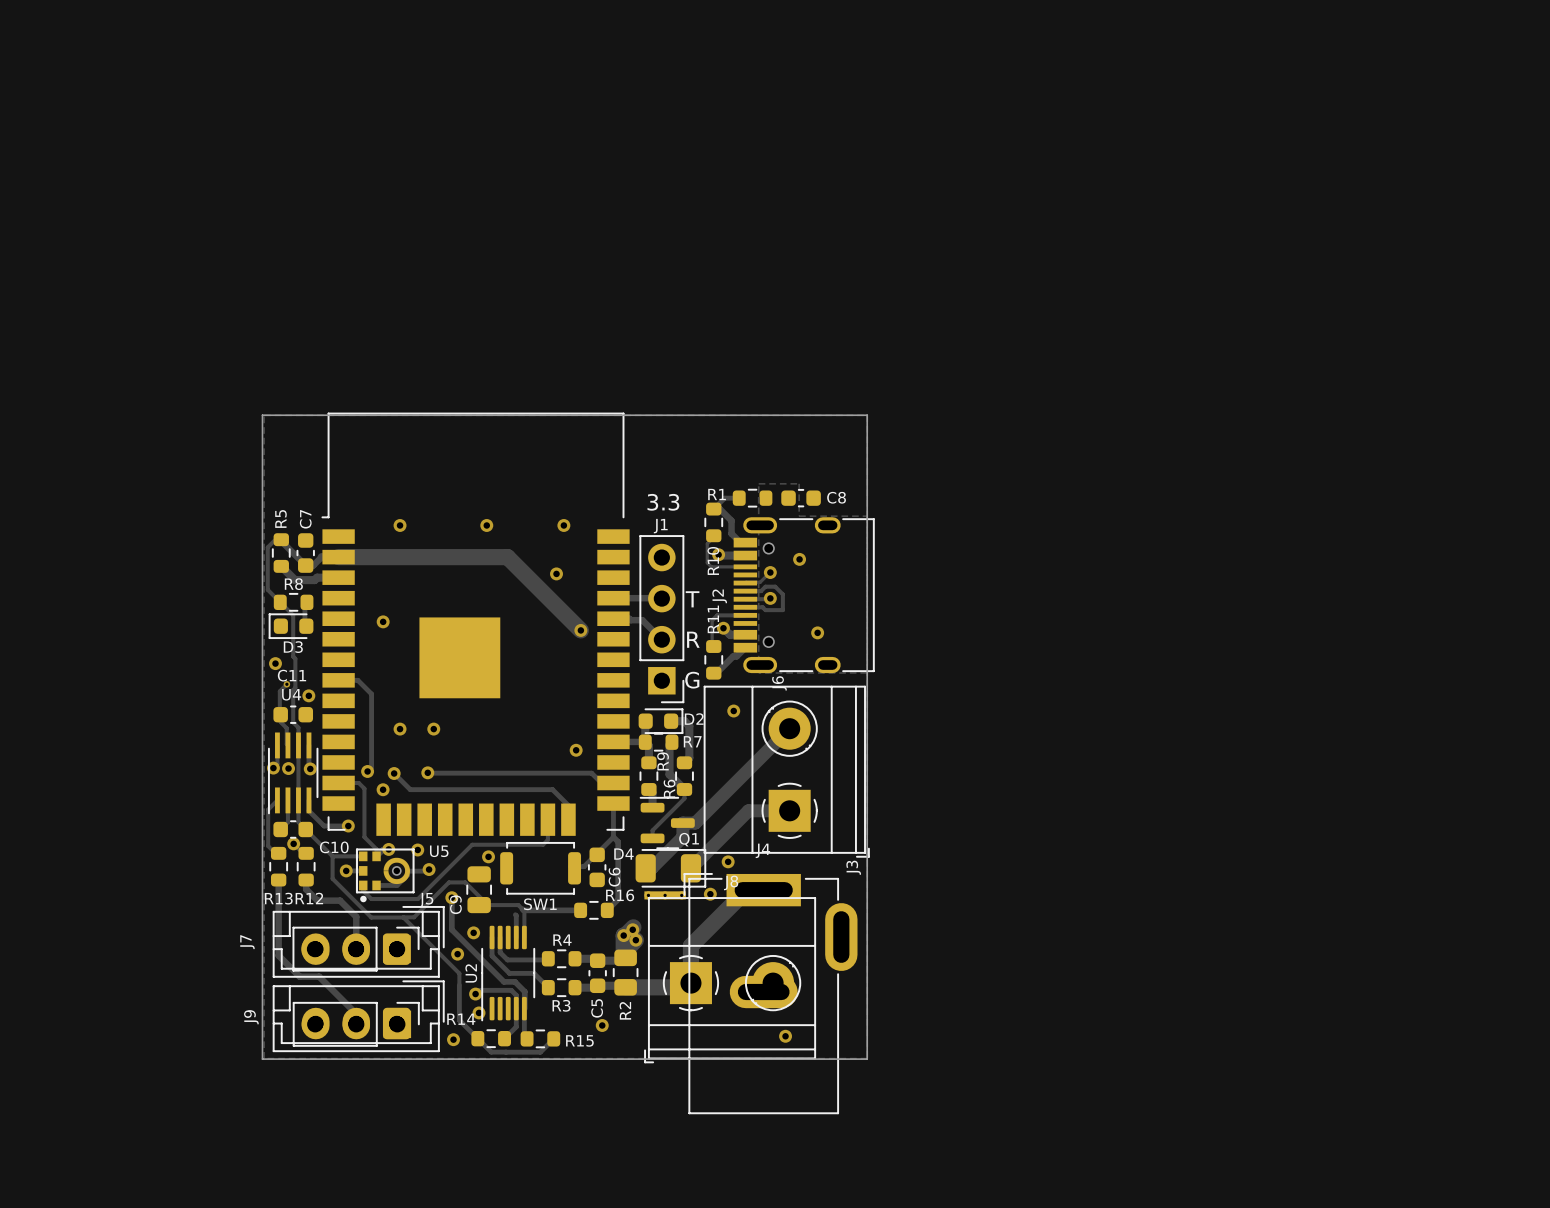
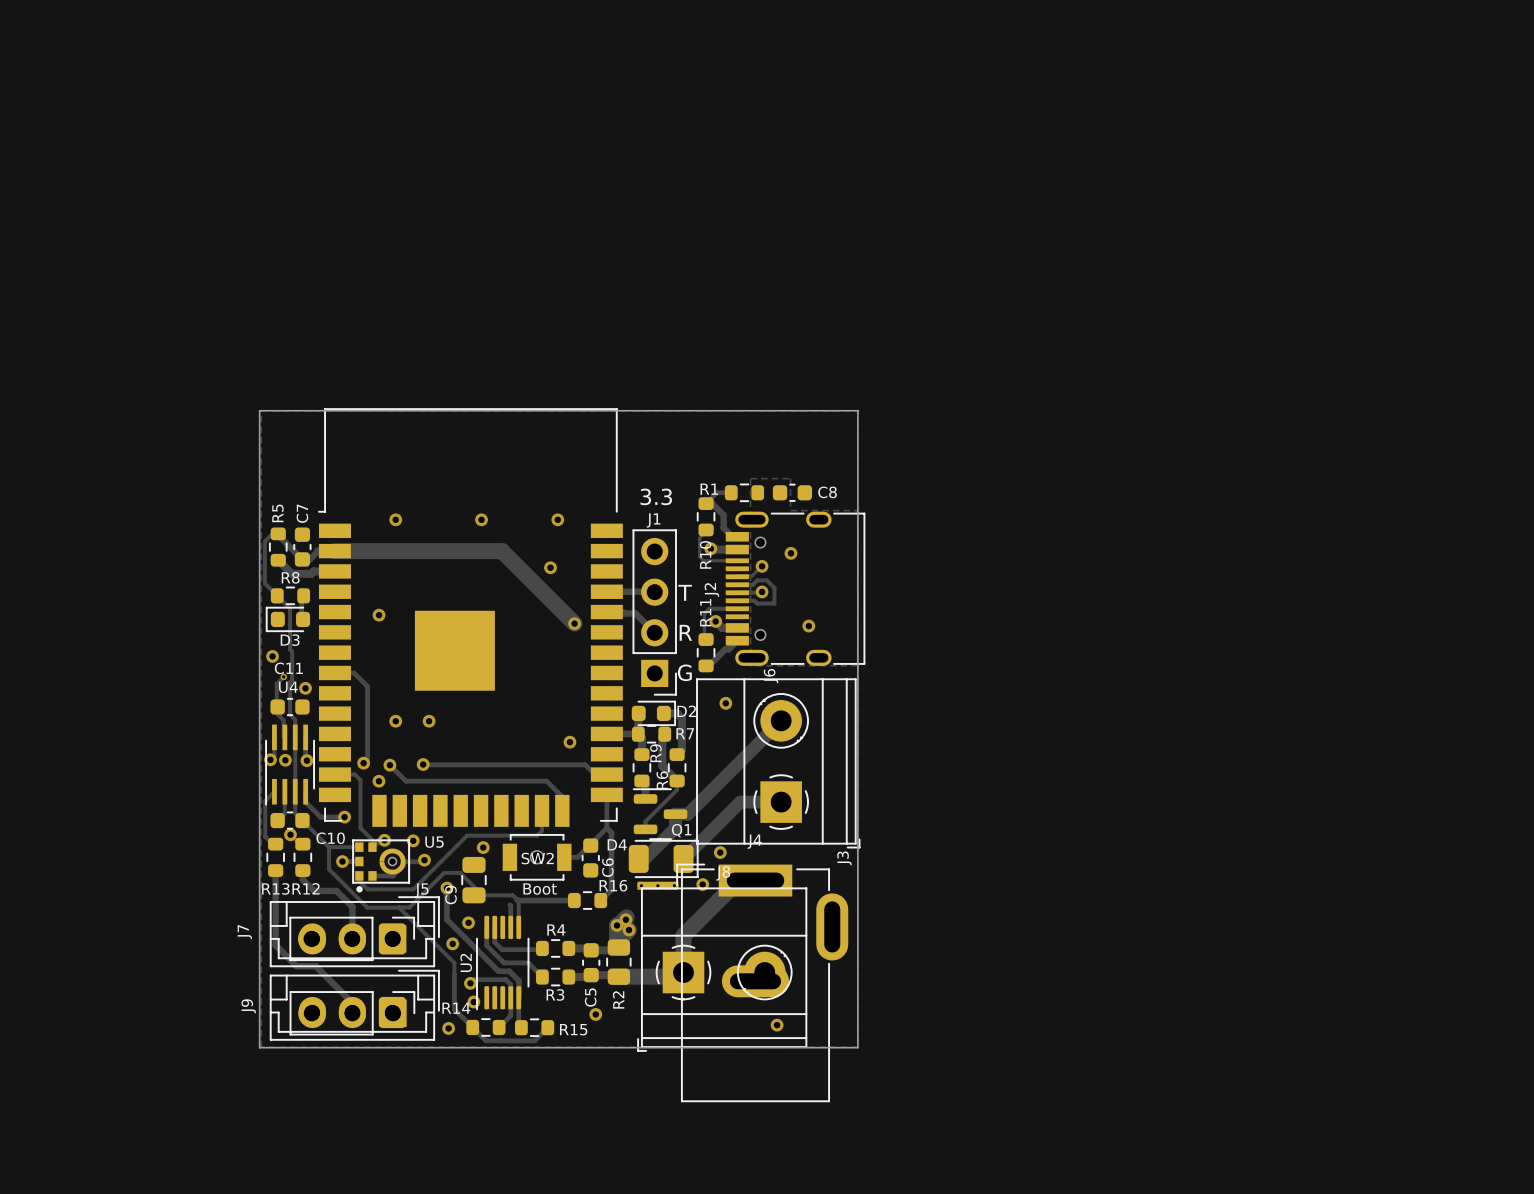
SW2: none -> Boot (537, 857)
SW1: (540, 868) -> none

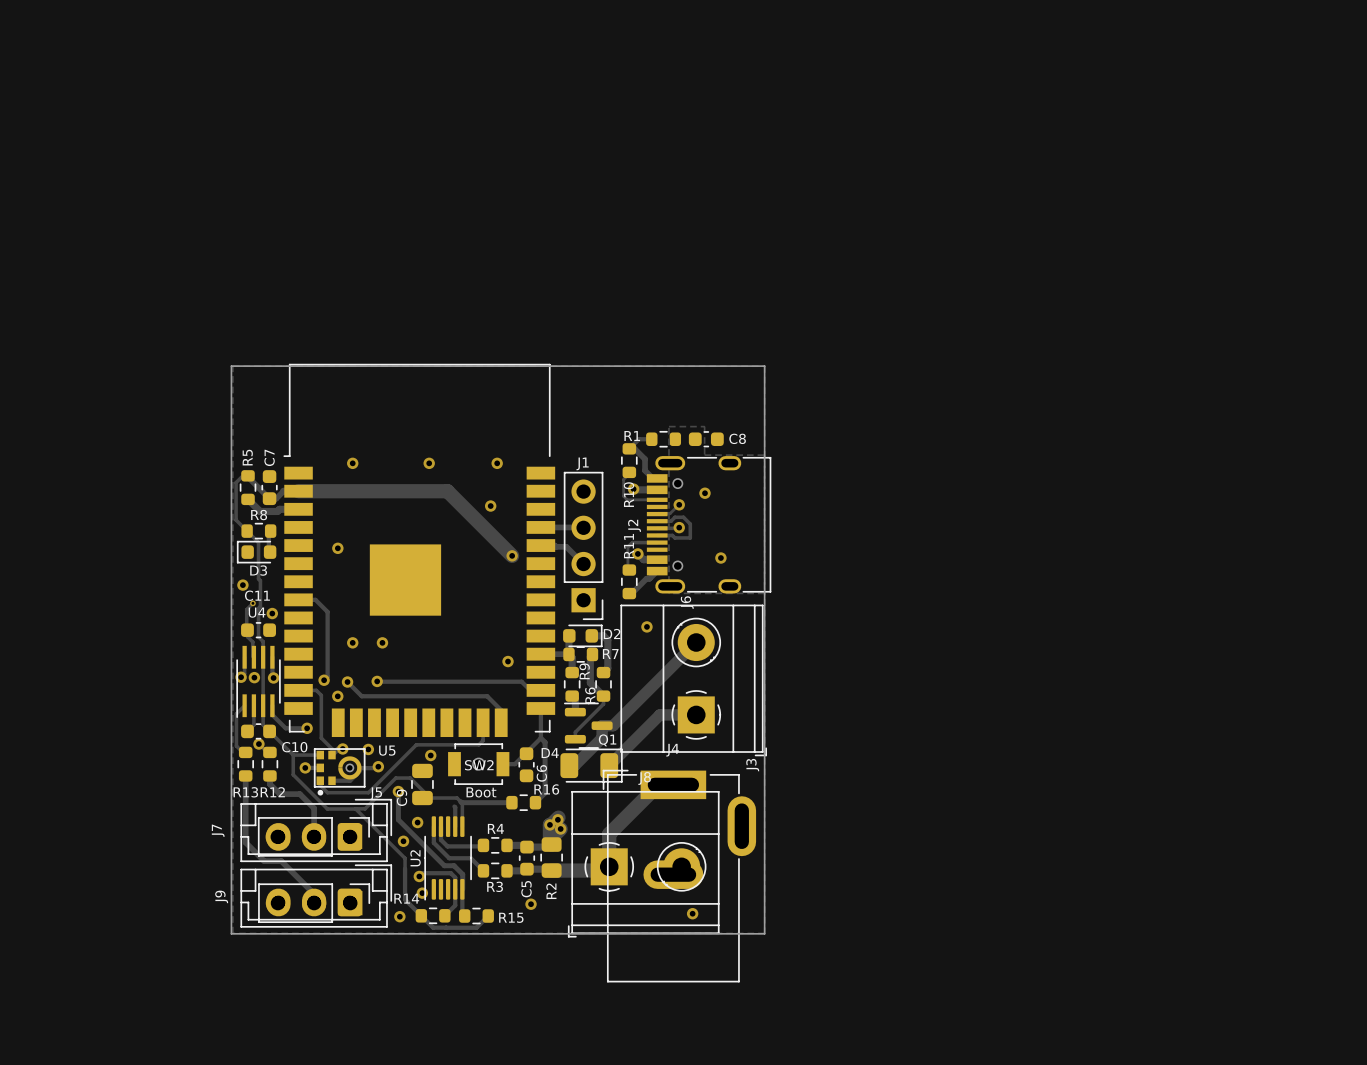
text: 3.3 (656, 496) -> none
text: T (685, 592) -> none
text: R (685, 632) -> none
text: G (684, 672) -> none
via: (720, 852) -> none
via: (702, 884) -> none
part: (657, 885) -> none

